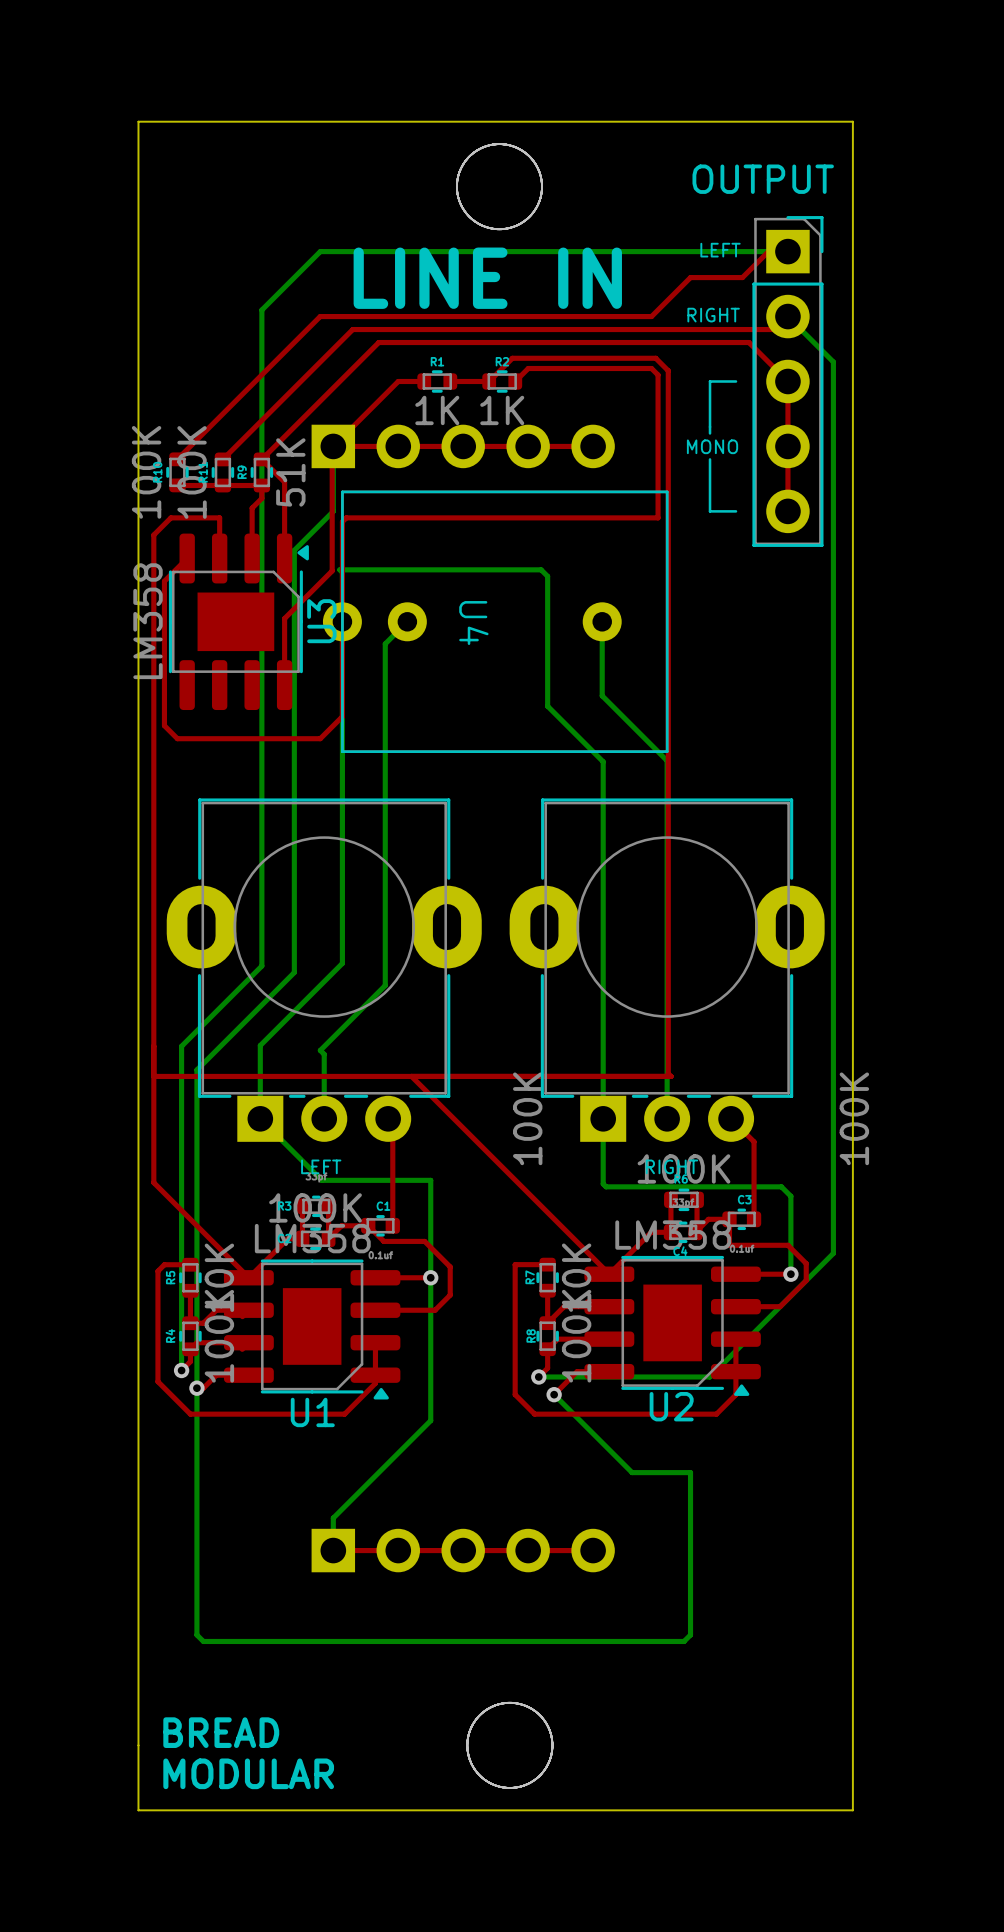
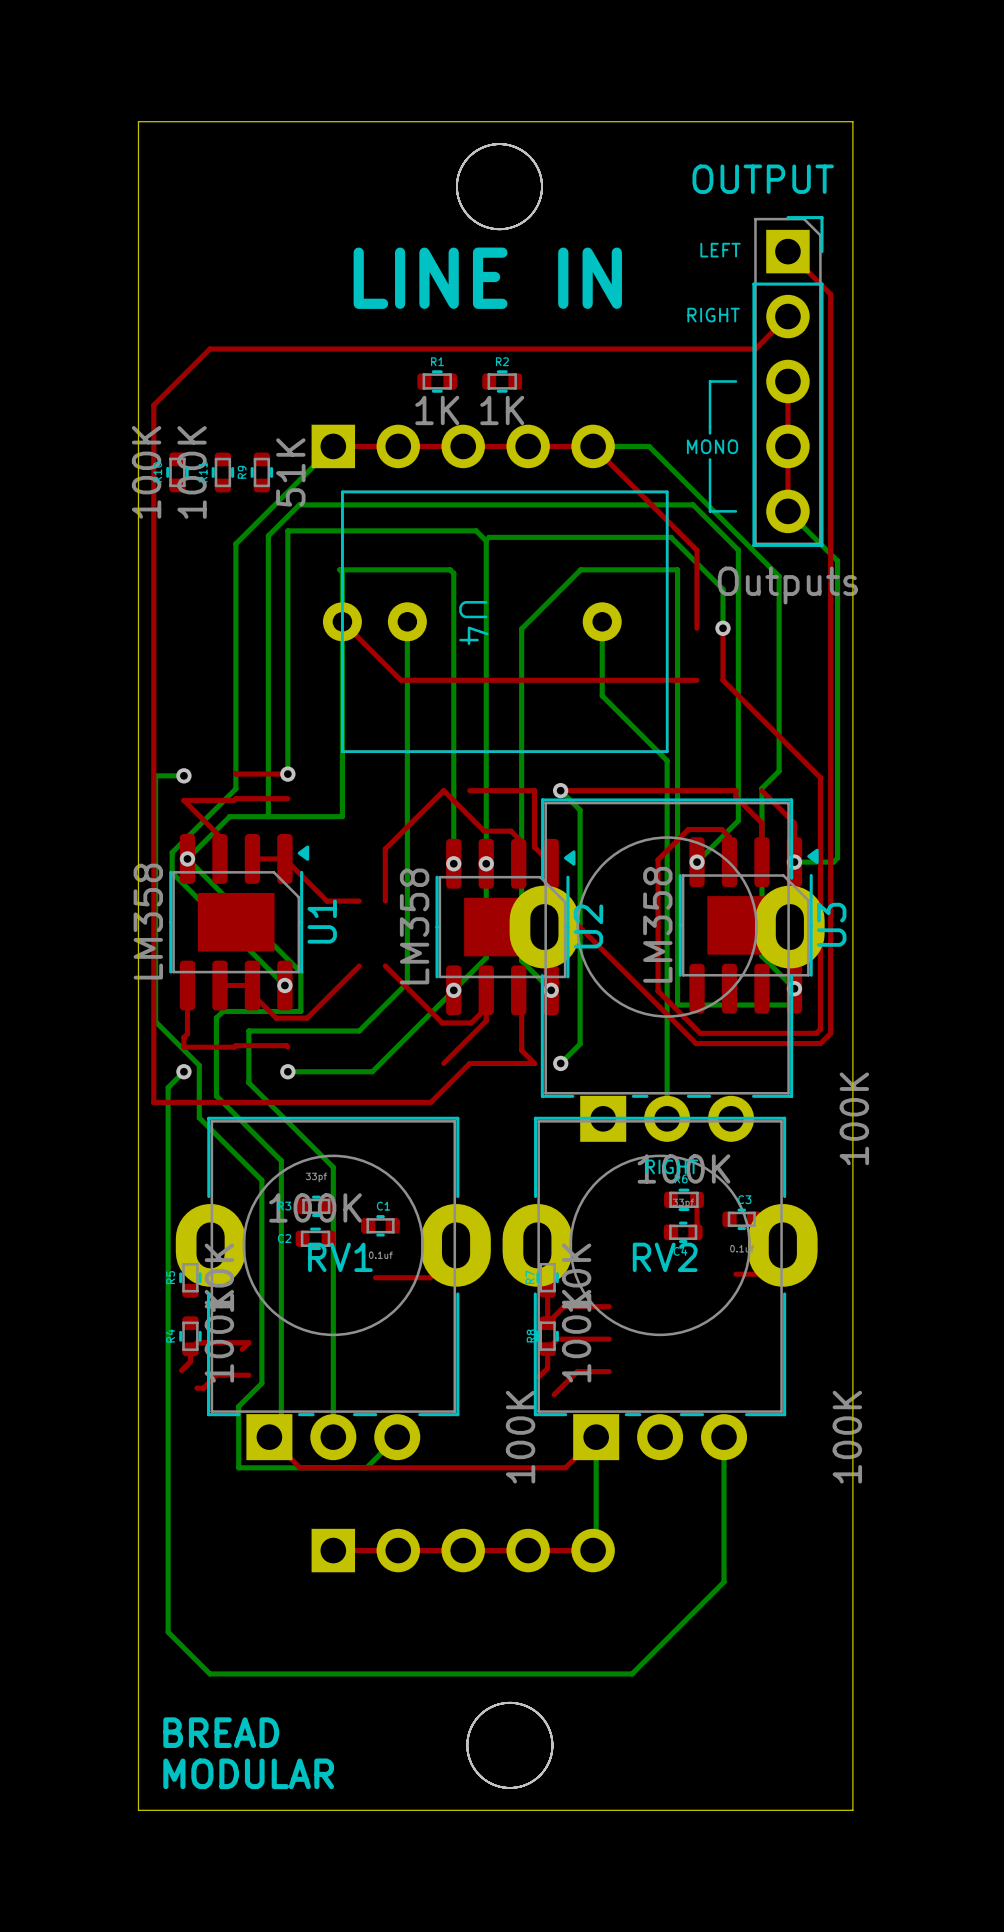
top track: (787, 251) (768, 251) (742, 277) (690, 277) (651, 316) (320, 316) (177, 459) -> (787, 251) (830, 294) (830, 1033) (820, 1043) (696, 1043) (551, 898) (551, 863) (534, 847) (534, 790) (469, 790)
bottom track: (787, 251) (320, 251) (261, 310) (261, 966) (181, 1046) (181, 1370) -> none
bottom track: (787, 316) (833, 362) (833, 1253) (709, 1376) (538, 1376) -> none
top track: (774, 329) (352, 329) (222, 459) -> (774, 329) (755, 349) (209, 349) (153, 405) (153, 535)
top track: (424, 381) (398, 381) (332, 447) (332, 570) (284, 618) (284, 685) -> none
top track: (450, 381) (489, 381) (512, 358) (655, 358) (668, 370) (668, 1073) (671, 1076) (153, 1076) -> none
top track: (515, 381) (528, 368) (651, 368) (658, 375) (658, 517) (346, 517) (342, 521) (342, 716) (320, 738) (177, 738) (164, 725) (164, 581) (187, 558) -> none
top track: (787, 381) (748, 342) (378, 342) (261, 459) (284, 482) (284, 558) -> none
bottom track: (333, 446) (333, 511) (294, 550) (294, 972) (196, 1069) (196, 1634) (203, 1641) (684, 1641) (690, 1634) (690, 1472) (632, 1472) (554, 1394) -> (333, 446) (235, 543) (235, 788) (172, 852) (172, 872) (284, 985)
top track: none -> (593, 446) (696, 550) (696, 628)
bottom track: none -> (593, 446) (649, 446) (779, 576) (779, 771) (761, 788) (761, 956) (794, 988) (794, 1004) (677, 1004) (677, 569) (580, 569) (521, 628) (521, 960) (551, 990)
top track: (177, 485) (261, 485) (261, 498) (252, 508) (252, 558) -> none
bottom track: none -> (787, 511) (837, 560) (837, 857) (833, 862) (794, 862)
top track: (153, 535) (170, 517) (219, 517) (219, 558) -> none
bottom track: none -> (486, 540) (476, 530) (287, 530) (287, 774)
bottom track: (450, 569) (541, 569) (547, 576) (547, 706) (603, 761) (603, 1183) (606, 1186) (781, 1186) (790, 1196) (790, 1274) -> (450, 569) (453, 573) (453, 863)
OUTPUT value: none -> Outputs (787, 585)
U3 position: (238, 621) -> (748, 925)
top track: none -> (342, 621) (400, 680) (696, 680)
bottom track: (407, 621) (385, 643) (385, 985) (320, 1050) (324, 1054) (324, 1118) -> (407, 621) (407, 982) (359, 1030) (248, 1030) (248, 1082) (333, 1167) (333, 1437)
top track: none -> (723, 628) (723, 680) (820, 777) (820, 1029) (816, 1033) (700, 1033) (658, 991) (658, 859) (688, 829) (721, 829) (729, 837) (729, 862)
bottom track: none -> (723, 628) (723, 589) (671, 537) (489, 537) (486, 540) (486, 957) (372, 1071) (287, 1071)
via: none -> (723, 628)
top track: none -> (235, 773) (287, 774)
via: none -> (287, 774)
bottom track: none -> (183, 775) (155, 775) (155, 1021) (199, 1065) (199, 1117) (261, 1180) (261, 1383) (238, 1406) (238, 1467) (366, 1467) (397, 1437)
via: none -> (183, 775)
top track: none -> (560, 790) (735, 790) (735, 797) (761, 823) (761, 862)
bottom track: none -> (560, 790) (580, 810) (580, 1044) (560, 1063)
via: none -> (560, 790)
top track: none -> (761, 790) (794, 823) (794, 862)
top track: none -> (287, 798) (183, 800) (219, 836) (219, 858)
bottom track: none -> (268, 816) (268, 535) (299, 504) (693, 504) (738, 550) (738, 820) (697, 862)
bottom track: (342, 816) (342, 963) (260, 1045) (260, 1118) (321, 1180) (430, 1180) (430, 1420) (333, 1518) (333, 1550) -> (342, 816) (229, 816) (187, 858) (300, 972) (300, 1011) (222, 1011) (216, 1017) (216, 1095) (281, 1160) (281, 1425) (269, 1437)
via: none -> (187, 858)
top track: none -> (252, 858) (284, 858) (327, 901) (359, 901)
via: none -> (697, 862)
via: none -> (794, 862)
via: none -> (453, 863)
via: none -> (486, 863)
top track: none -> (518, 863) (518, 838) (511, 831) (484, 831) (443, 790) (385, 849) (385, 901)
top track: none -> (359, 966) (307, 1018) (276, 1018) (252, 994) (252, 985) (219, 985)
top track: none -> (385, 966) (442, 1022) (471, 1022) (486, 1007)
LEFT: 100K (324, 970) -> none
top track: none -> (187, 985) (187, 1033) (183, 1037) (183, 1047) (235, 1045) (287, 1047)
via: none -> (284, 985)
via: none -> (794, 988)
via: none -> (453, 990)
top track: none -> (486, 990) (486, 1020) (443, 1063)
via: none -> (551, 990)
via: none -> (560, 1063)
bottom track: none -> (183, 1071) (168, 1087) (168, 1632) (209, 1673) (632, 1673) (724, 1582) (724, 1437)
via: none -> (183, 1071)
via: none -> (287, 1071)
top track: (411, 1076) (609, 1274) (651, 1232) (670, 1232) (670, 1199) -> none
top track: (153, 1102) (153, 1182) (248, 1277) (287, 1238) (302, 1238) (304, 1206) -> (153, 1102) (430, 1102) (469, 1063) (534, 1063) (521, 1050) (521, 993) (518, 990)
top track: (388, 1118) (392, 1123) (392, 1225) -> none
top track: (731, 1118) (754, 1141) (754, 1219) -> none
top track: (328, 1206) (328, 1238) (341, 1225) (368, 1225) (383, 1241) (424, 1241) (450, 1266) (450, 1295) (435, 1310) (375, 1310) -> none
top track: (695, 1232) (708, 1219) (729, 1219) (729, 1245) (787, 1245) (806, 1263) (806, 1280) (780, 1306) (735, 1306) -> none
top track: (190, 1264) (164, 1264) (157, 1271) (157, 1381) (190, 1414) (344, 1414) (375, 1383) (375, 1342) -> none
top track: (515, 1264) (515, 1394) (534, 1414) (716, 1414) (735, 1394) (735, 1339) -> none
top track: (515, 1264) (547, 1264) -> none
via: (790, 1274) -> none
via: (430, 1277) -> none
RV1: none -> 100K (333, 1288)
RV2: none -> 100K (660, 1288)
top track: (190, 1290) (190, 1323) (203, 1323) (216, 1310) (248, 1310) (242, 1316) -> none
U2 rotation: 0° (672, 1325) -> 90° counterclockwise (505, 927)
U2 position: (672, 1325) -> (505, 927)
U1 rotation: 0° (312, 1329) -> 90° counterclockwise (239, 922)
U1 position: (312, 1329) -> (239, 922)
via: (181, 1370) -> none
via: (538, 1376) -> none
via: (196, 1388) -> none
via: (554, 1394) -> none
top track: none -> (269, 1437) (300, 1467) (565, 1467) (596, 1437)
bottom track: none -> (596, 1437) (596, 1547) (593, 1550)

